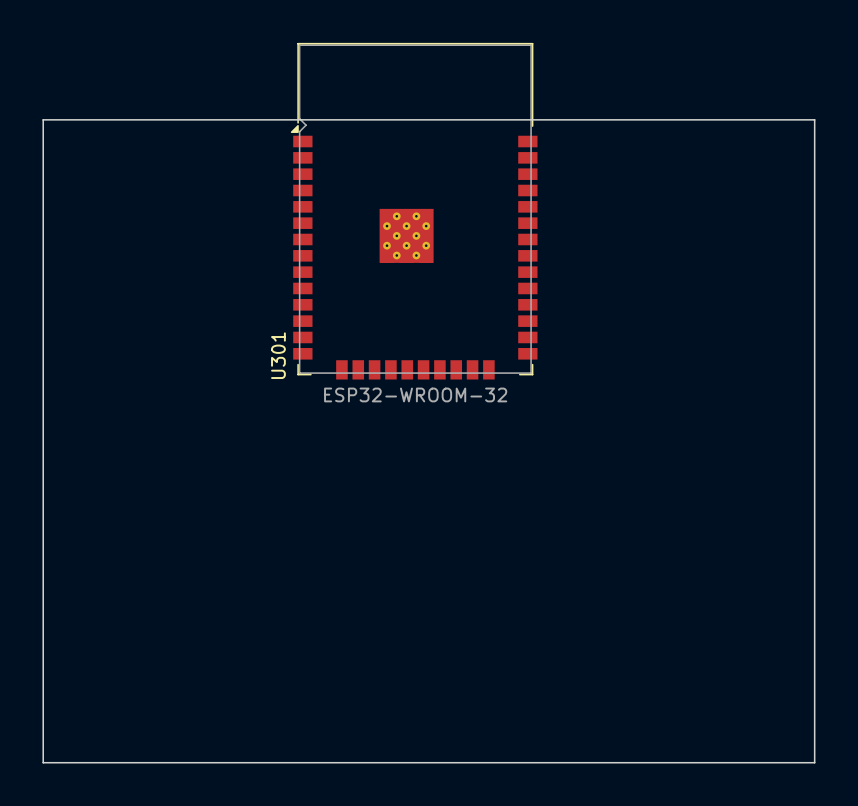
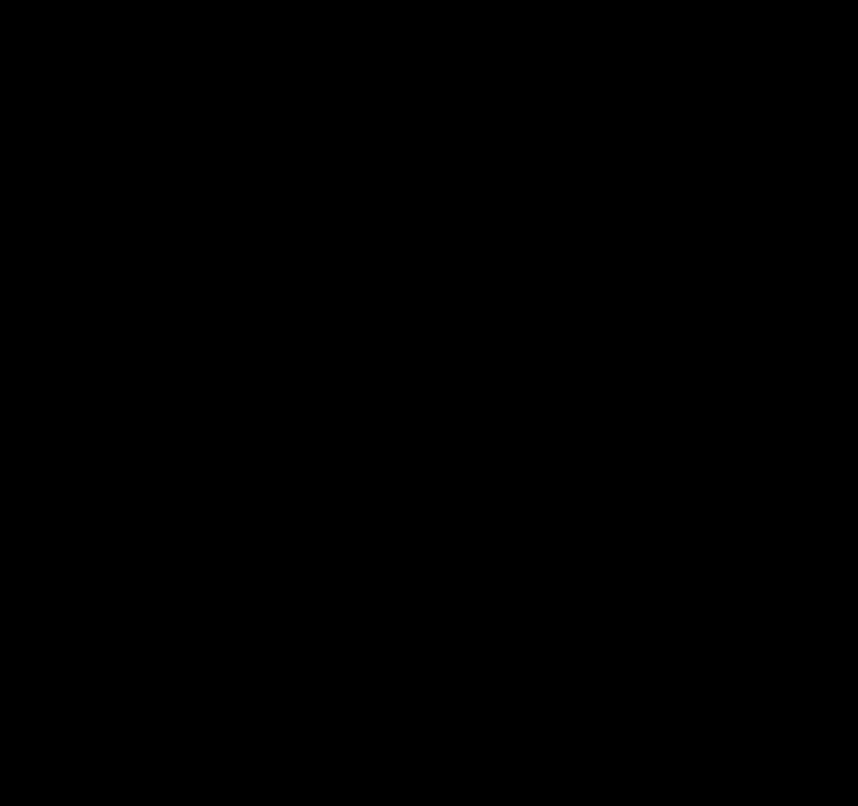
board edge: (43, 119) (814, 119) (814, 762) (43, 762) (43, 119) -> none
U301: ESP32-WROOM-32 (414, 211) -> none

